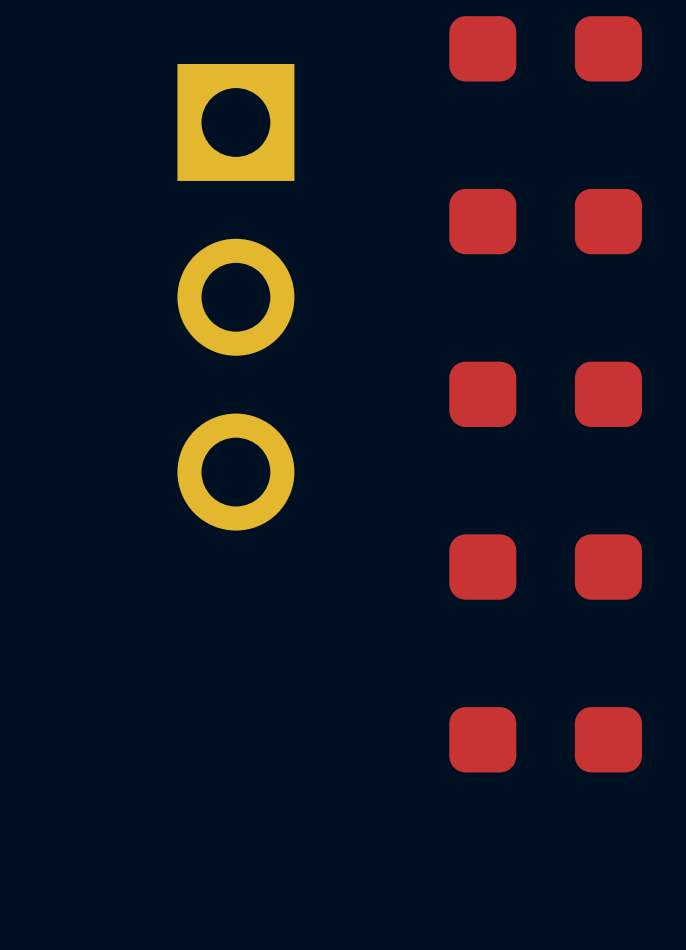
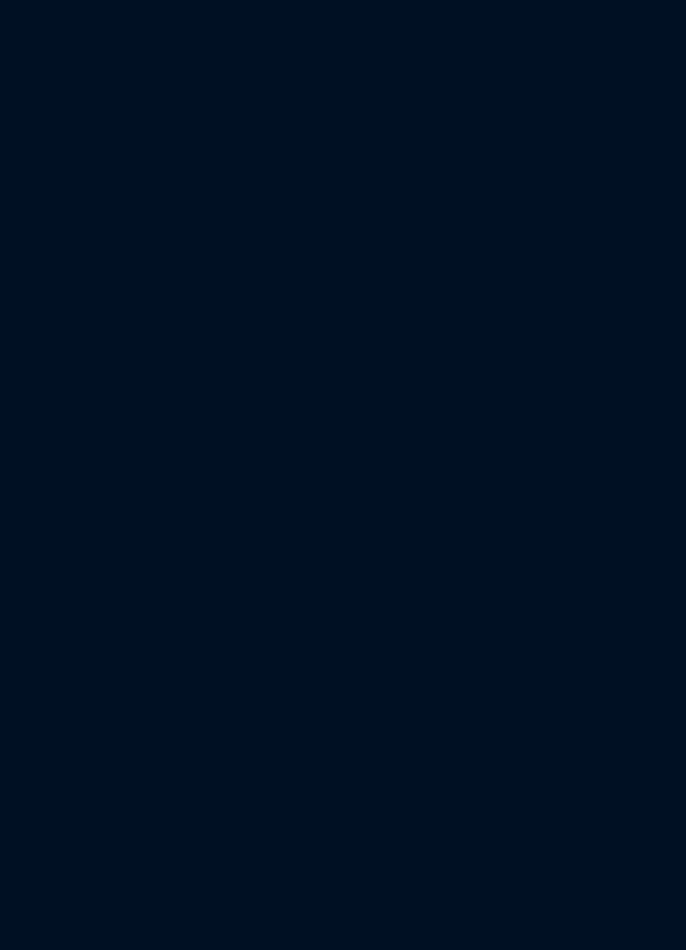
part: (545, 48) -> none
part: (545, 221) -> none
part: (235, 297) -> none
part: (545, 394) -> none
part: (545, 567) -> none
part: (545, 739) -> none

